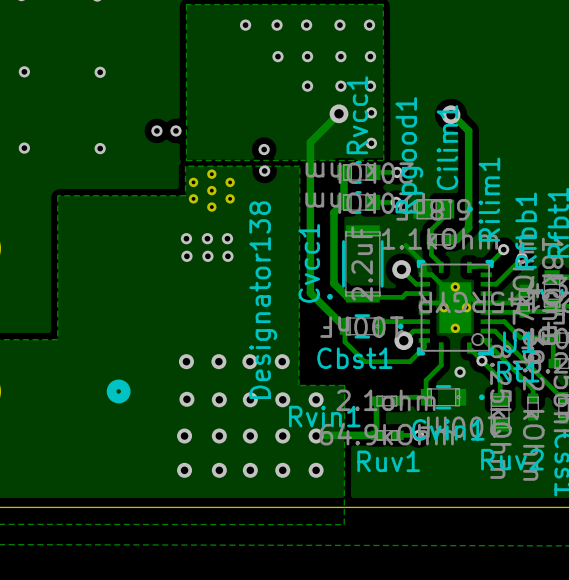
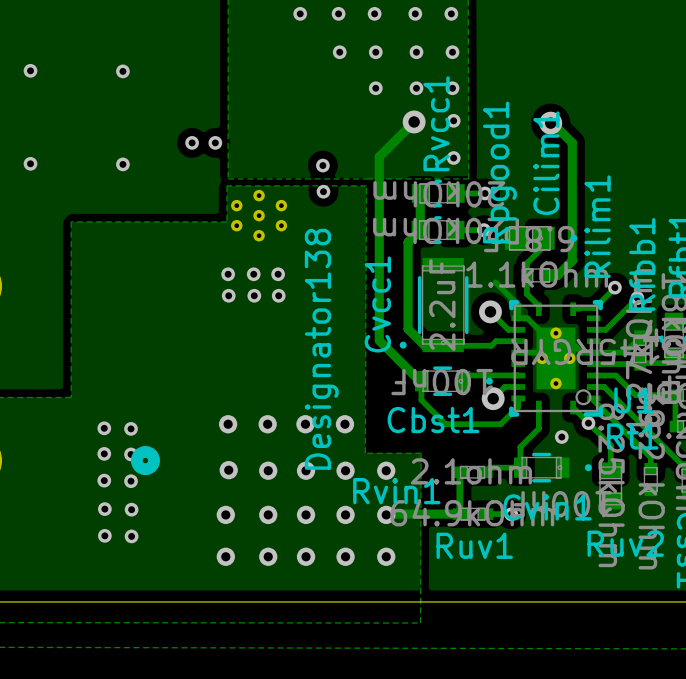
via: none -> (104, 428)
via: none -> (131, 428)
via: none -> (104, 453)
via: none -> (131, 454)
via: none -> (104, 480)
via: none -> (131, 481)
via: none -> (104, 509)
via: none -> (131, 509)
via: none -> (104, 535)
via: none -> (131, 536)

